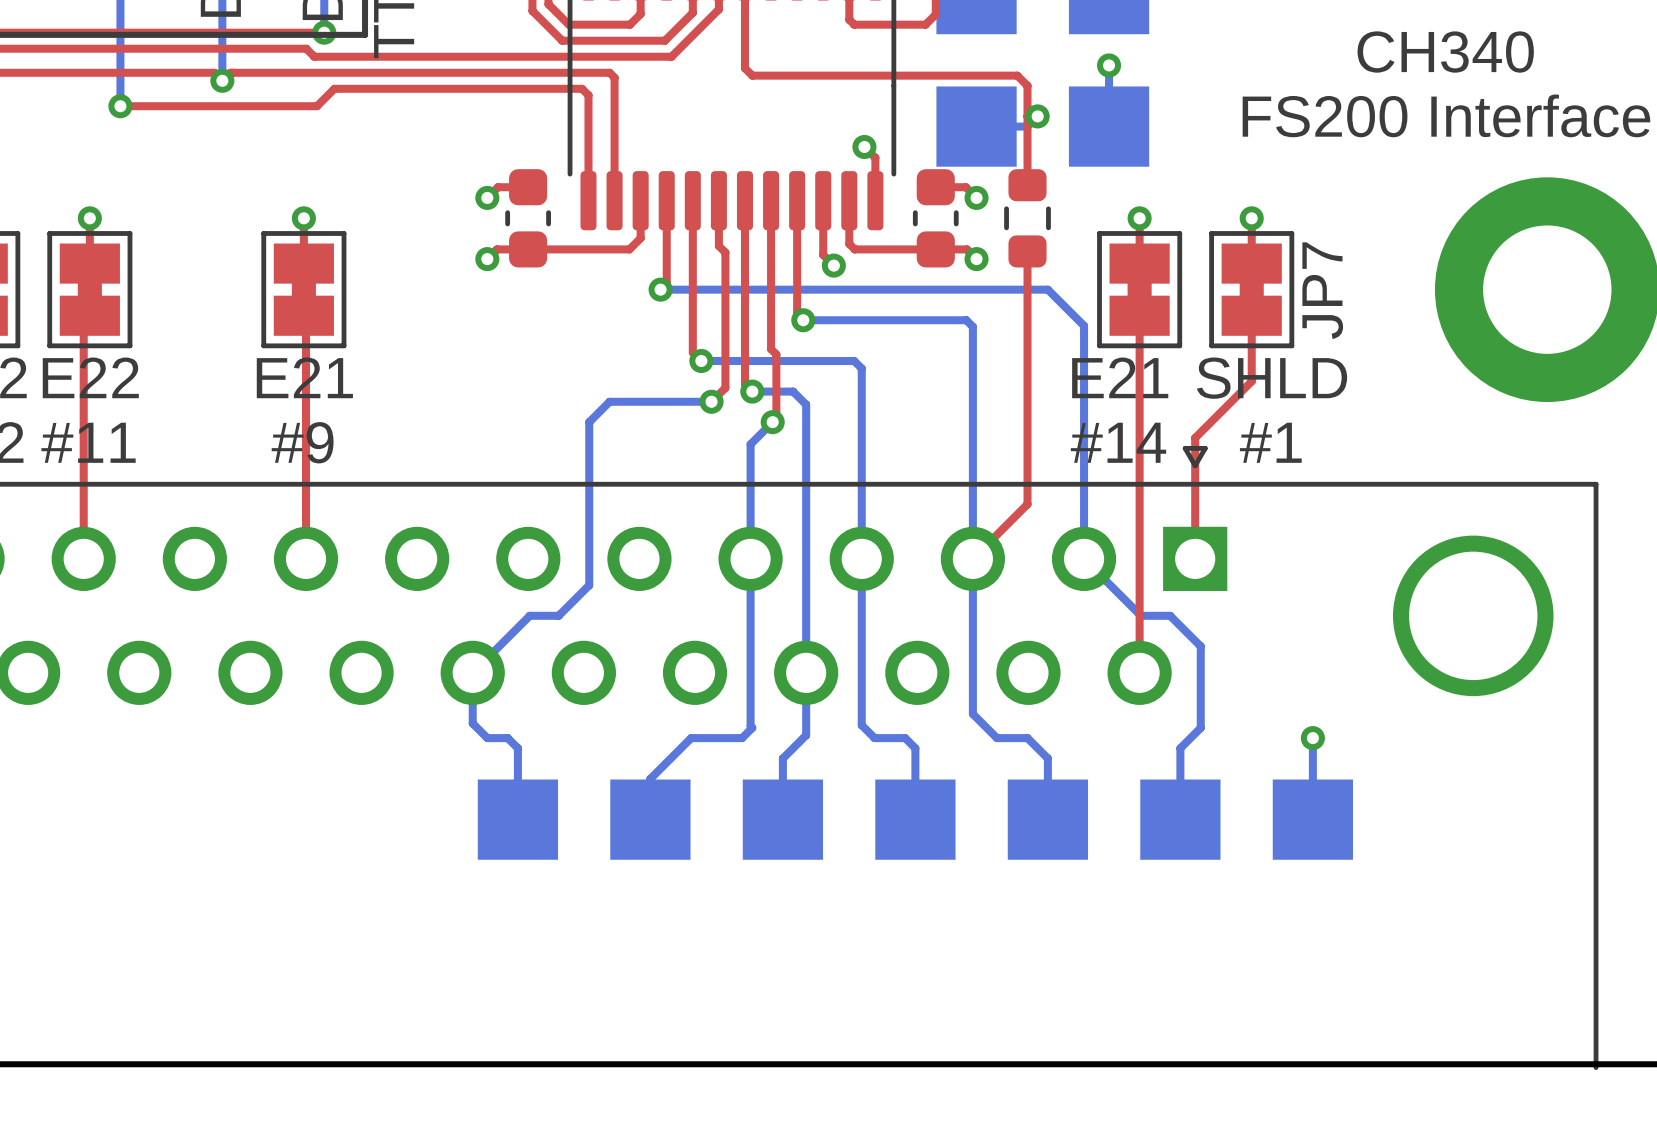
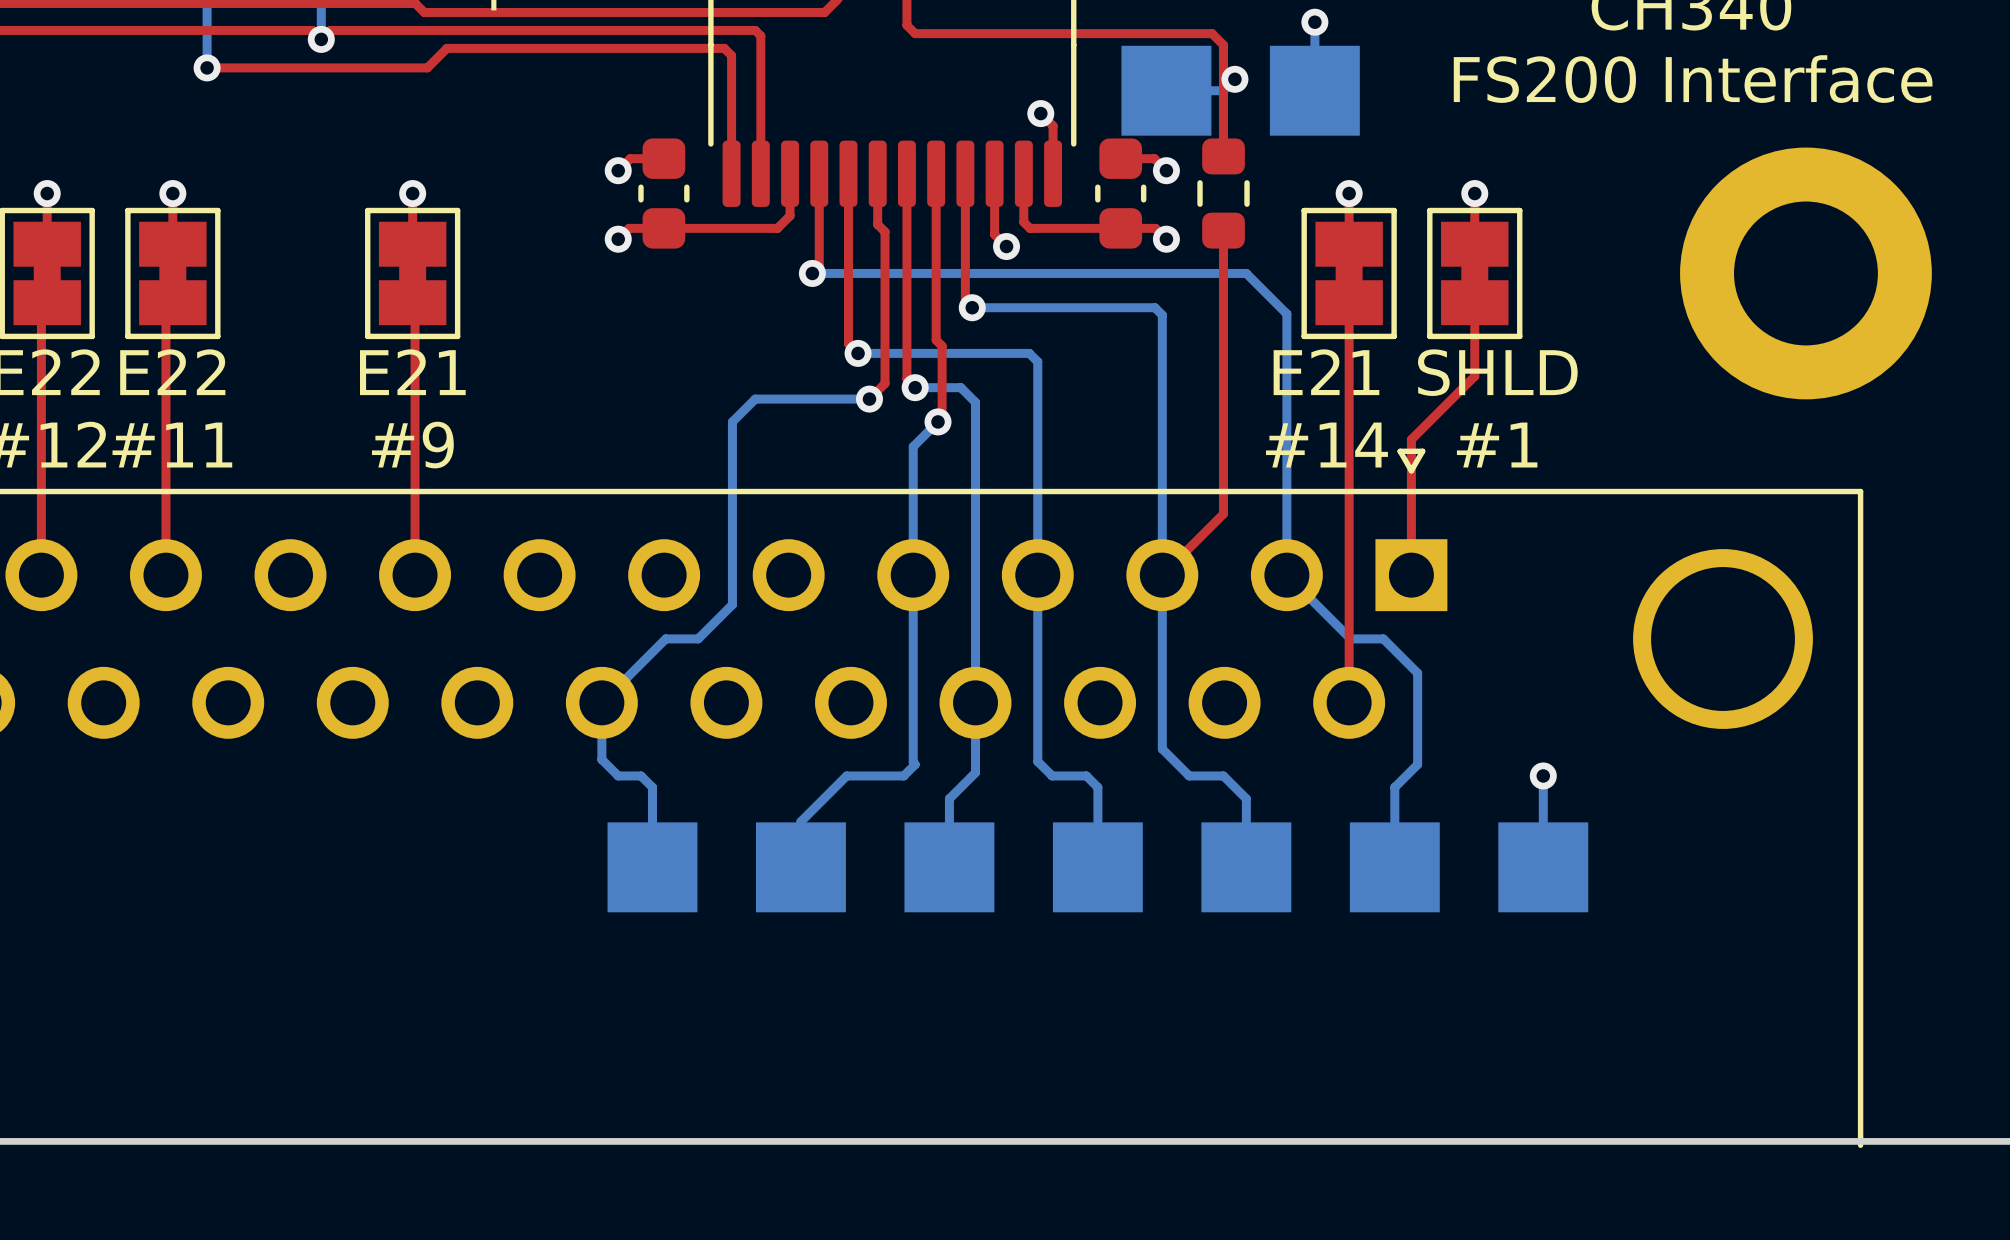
JP7 name: JP7 (1322, 290) -> none

